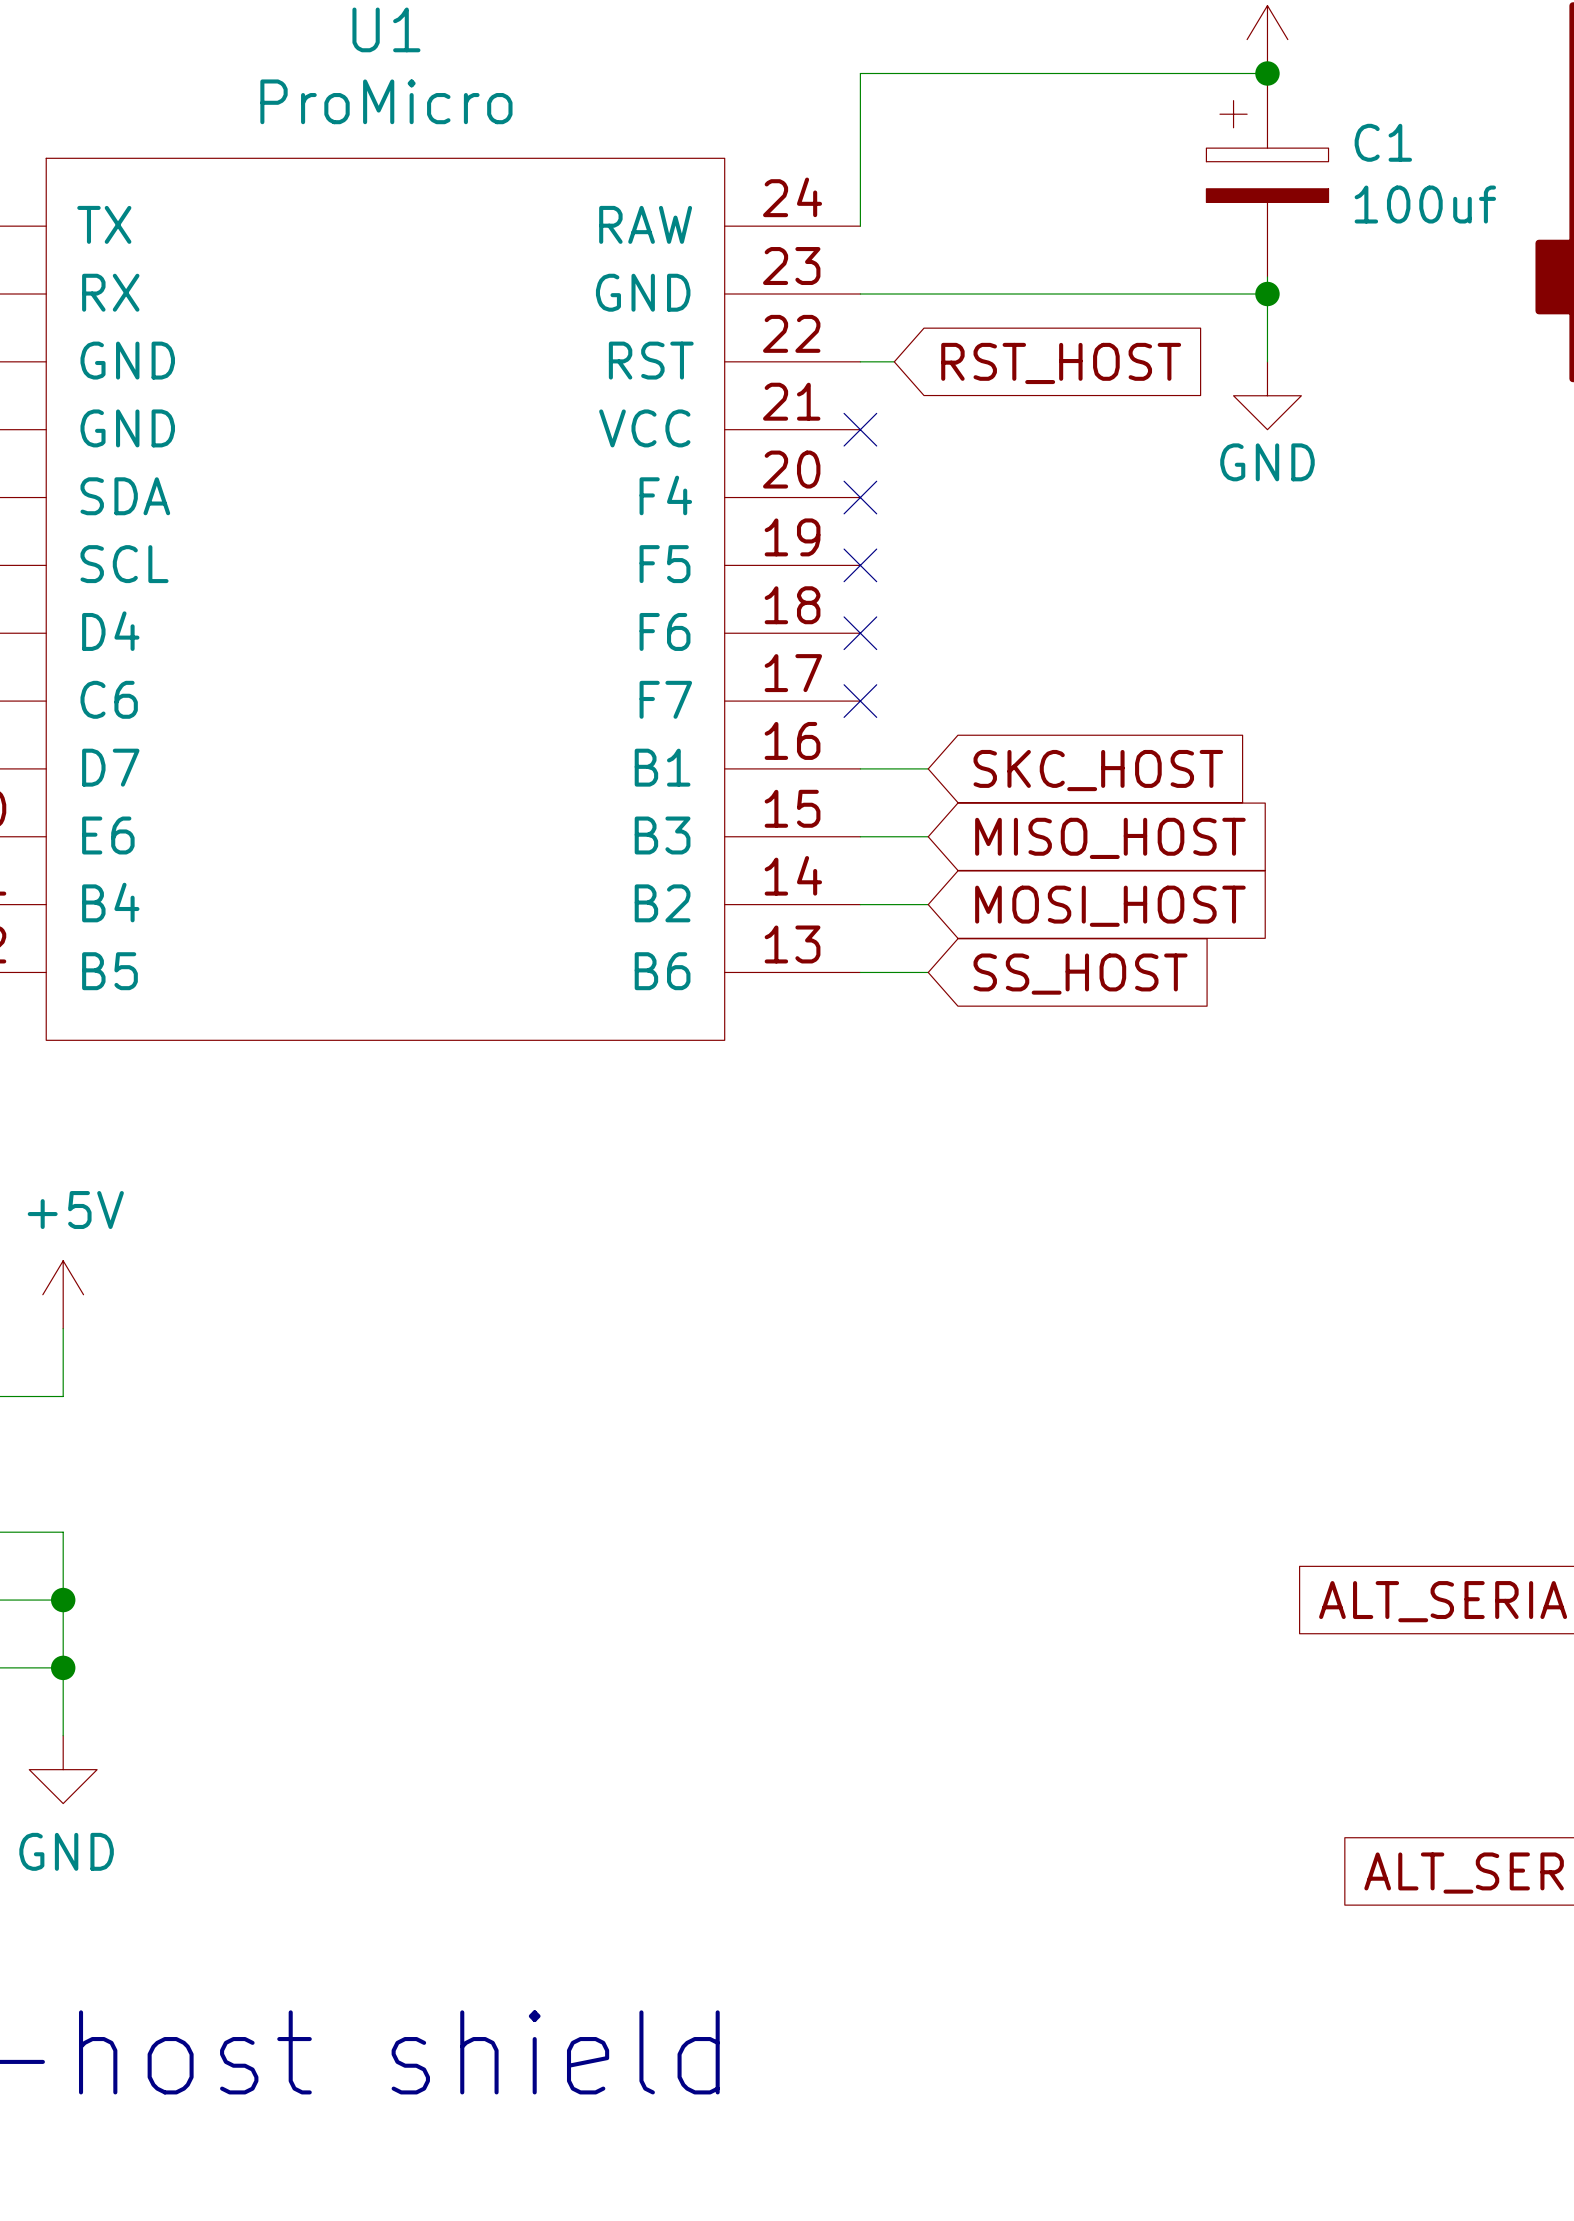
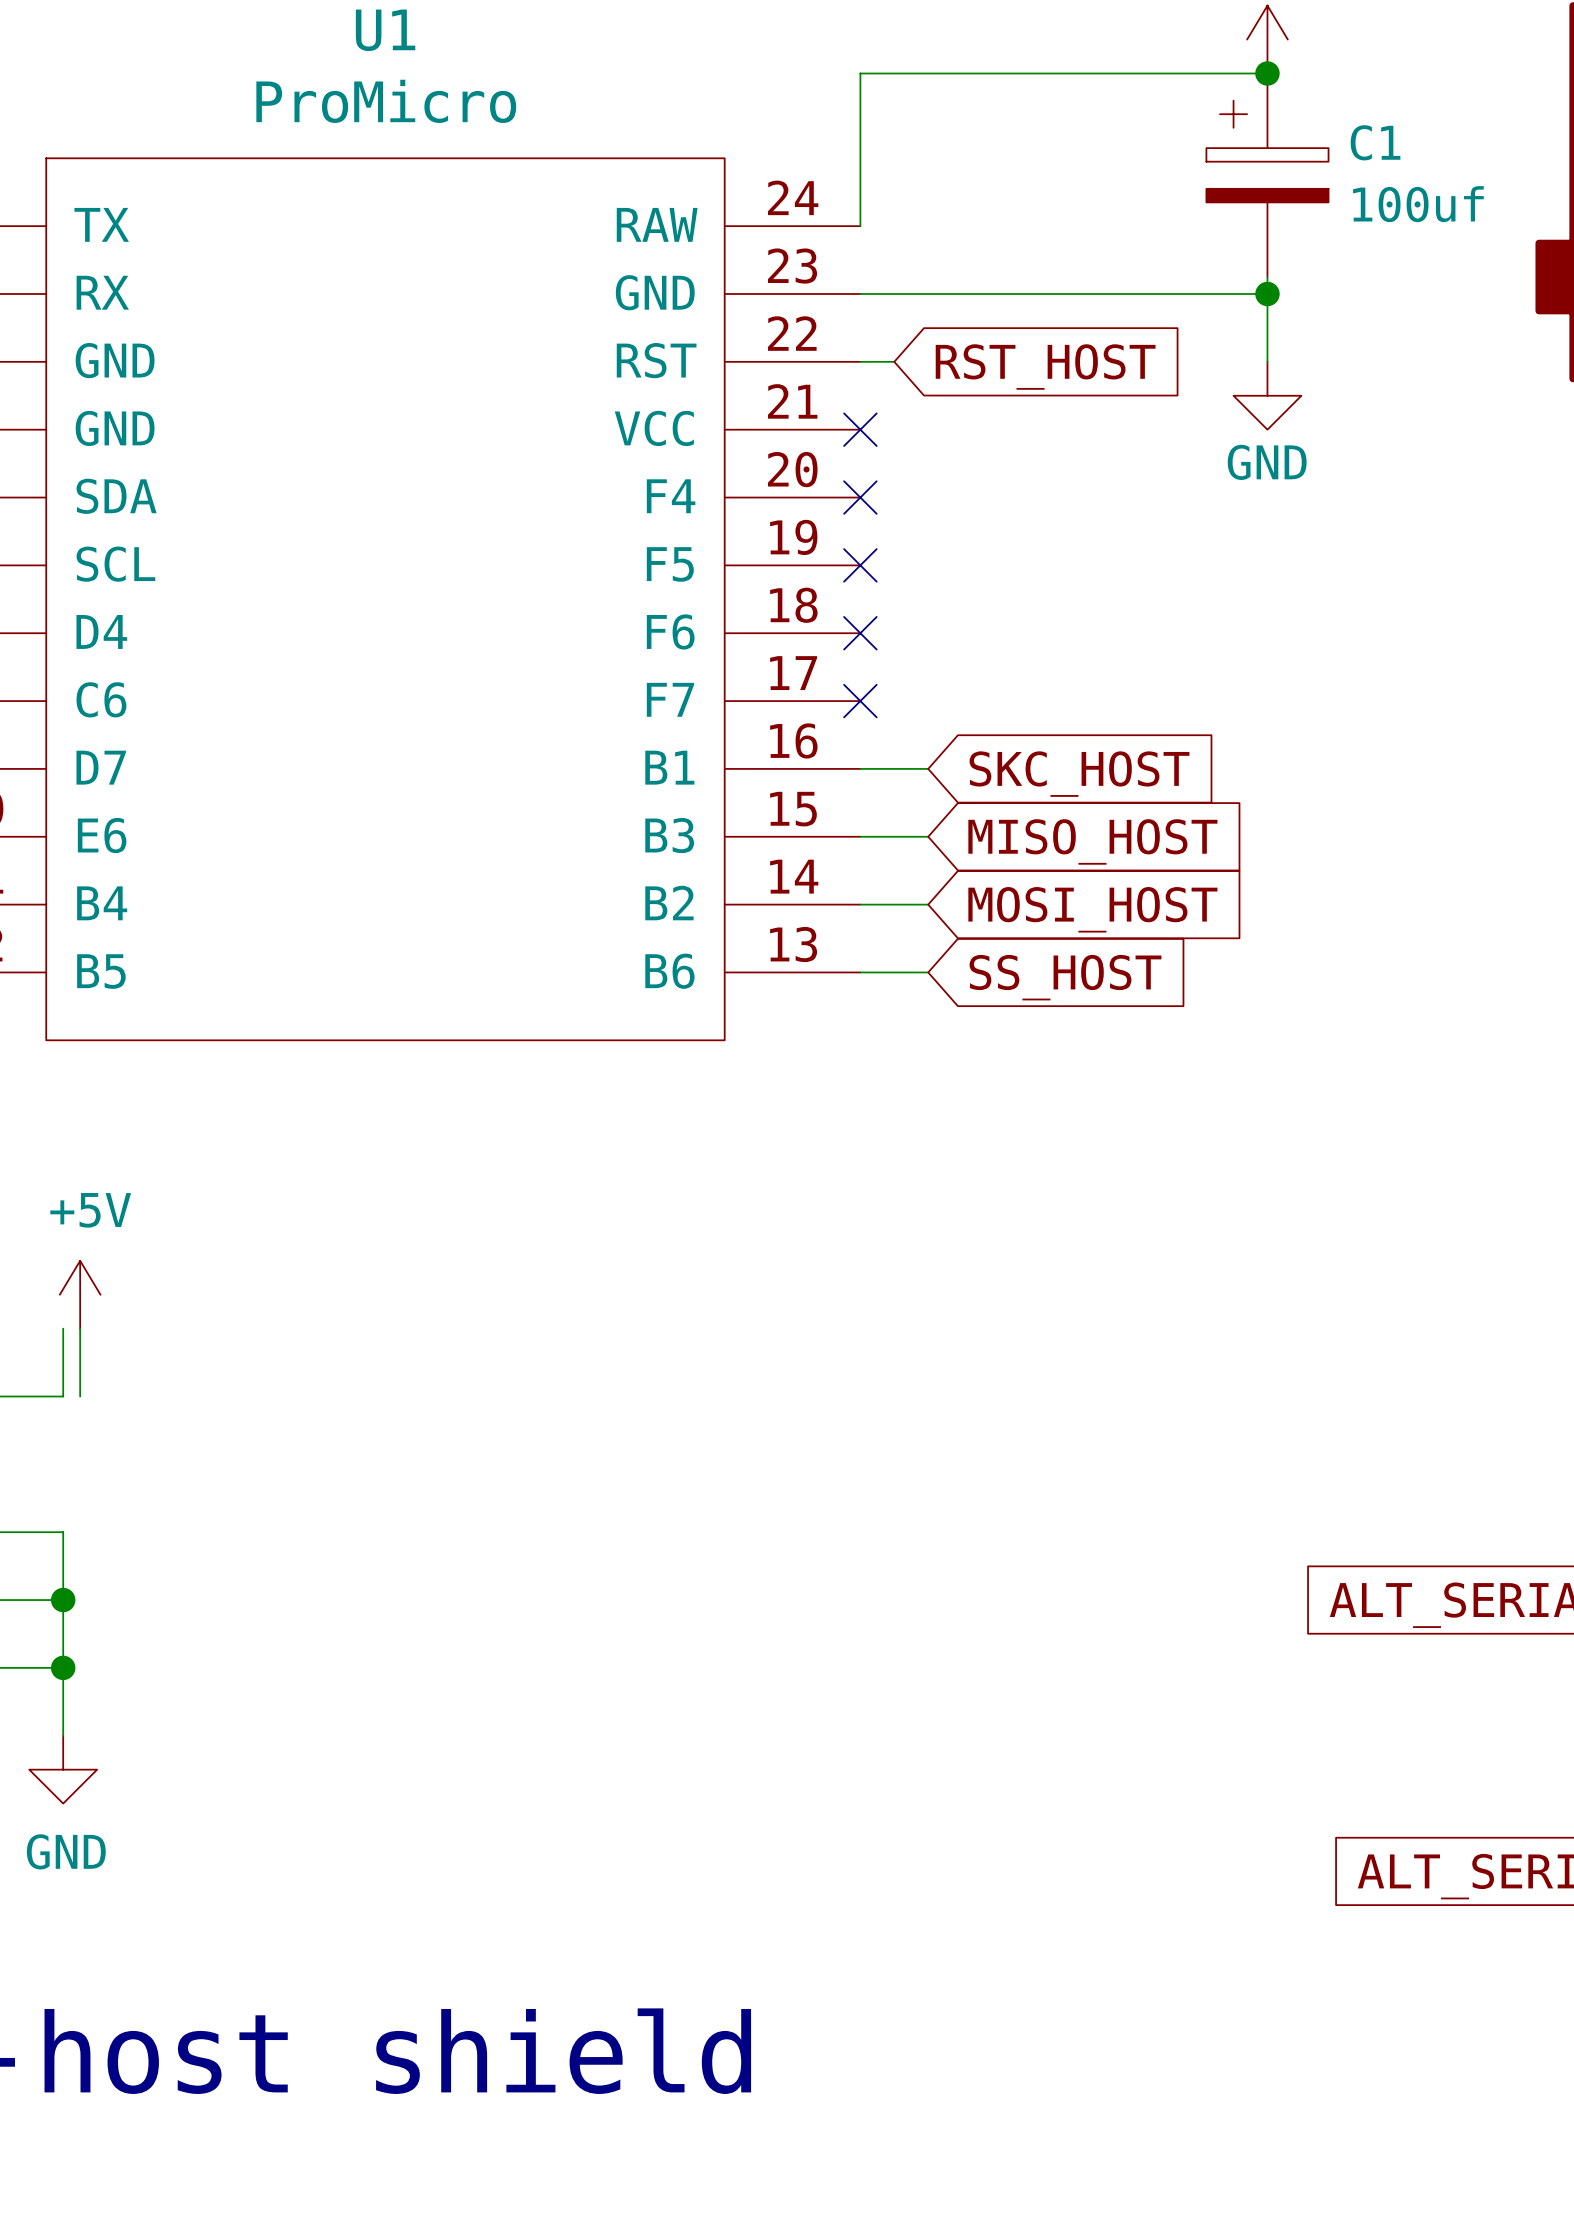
power symbol position: +5V (63, 1294) -> +5V (80, 1294)
wire: none -> (80, 1328) (80, 1396)

